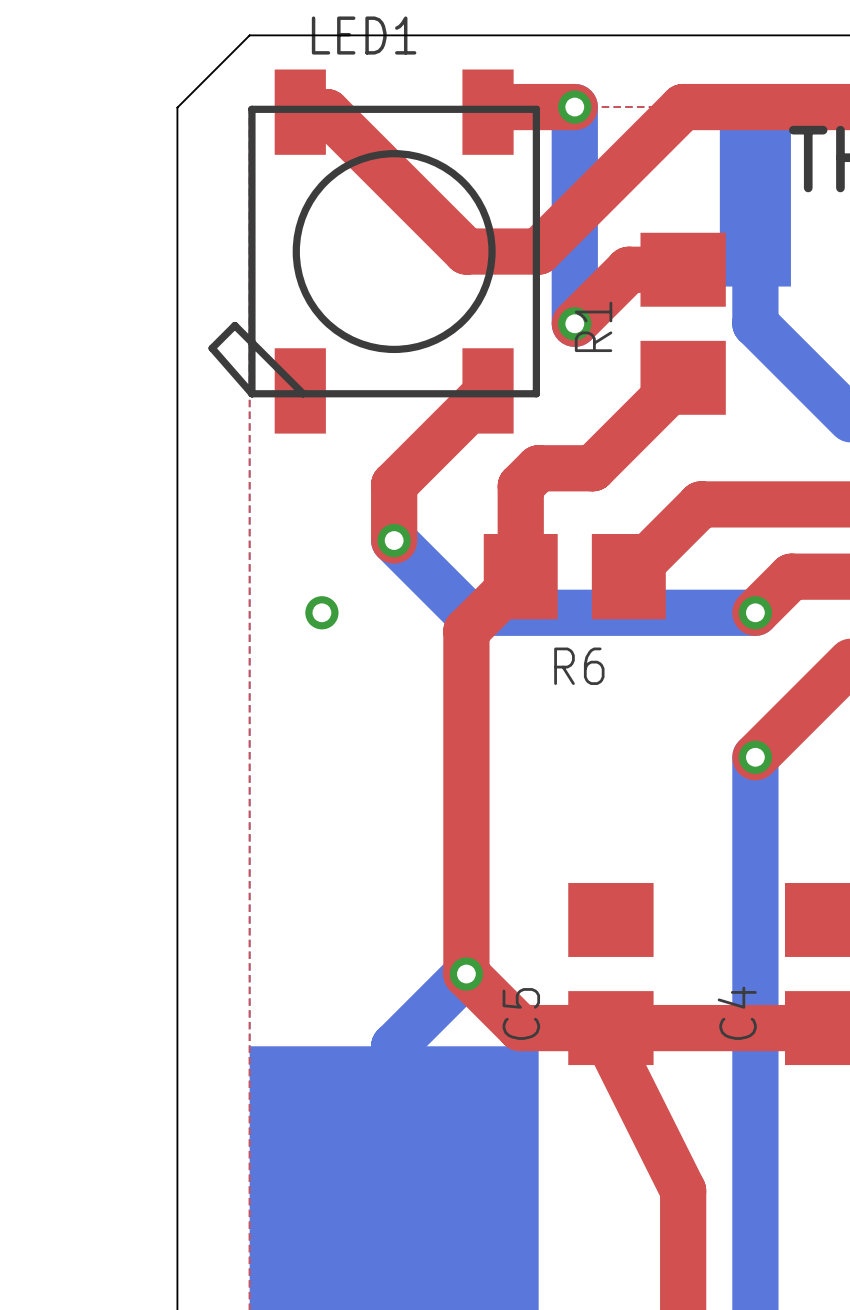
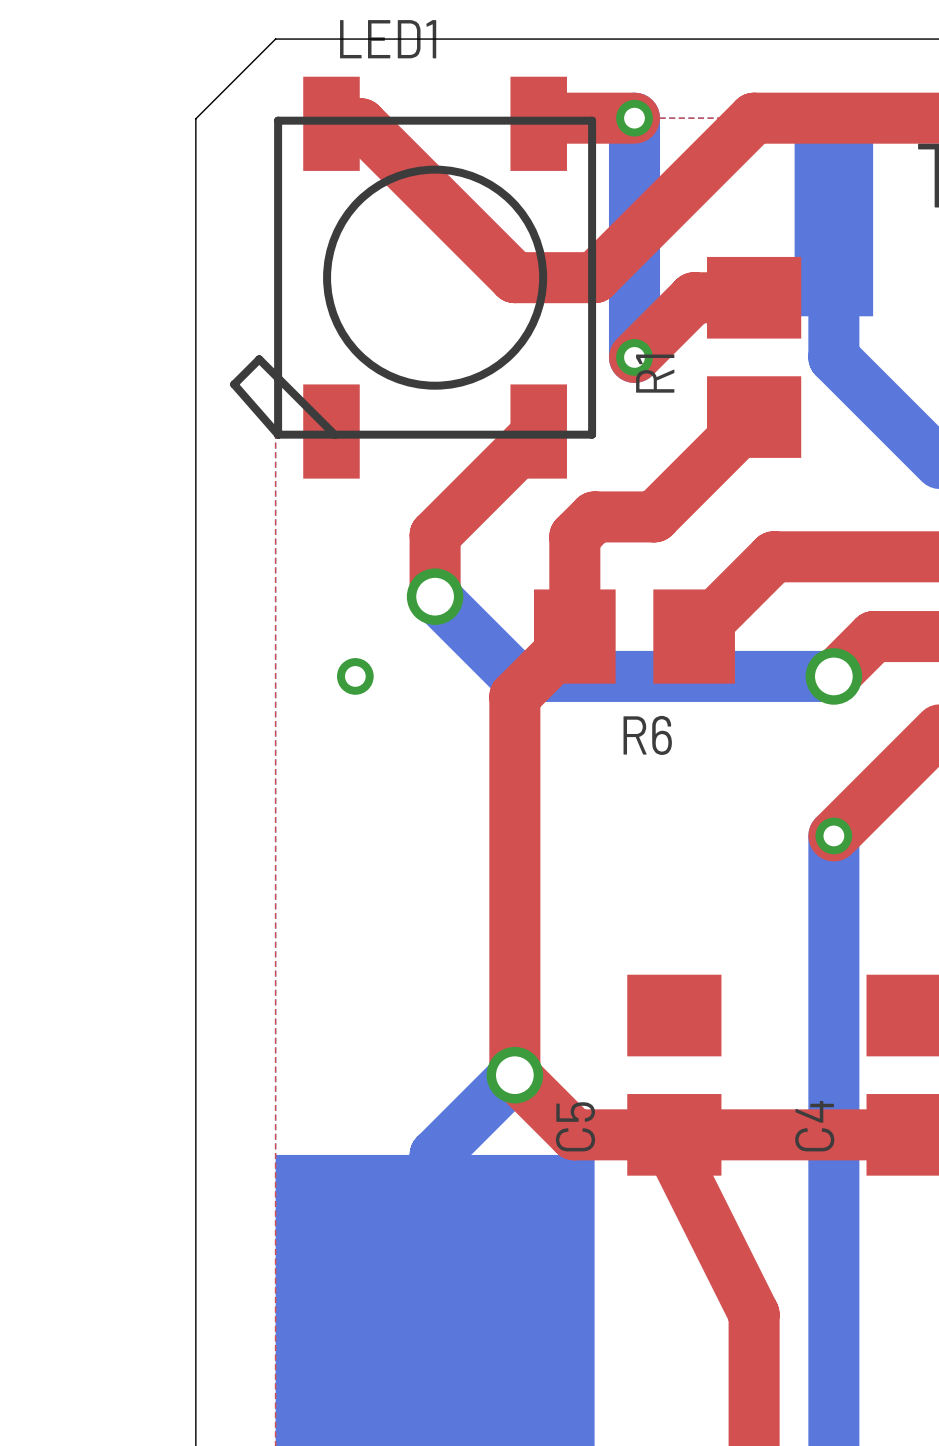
via size: [377, 523, 411, 558] -> [406, 568, 464, 625]
via size: [738, 596, 773, 630] -> [805, 648, 863, 705]
via size: [449, 957, 484, 991] -> [486, 1046, 544, 1104]

